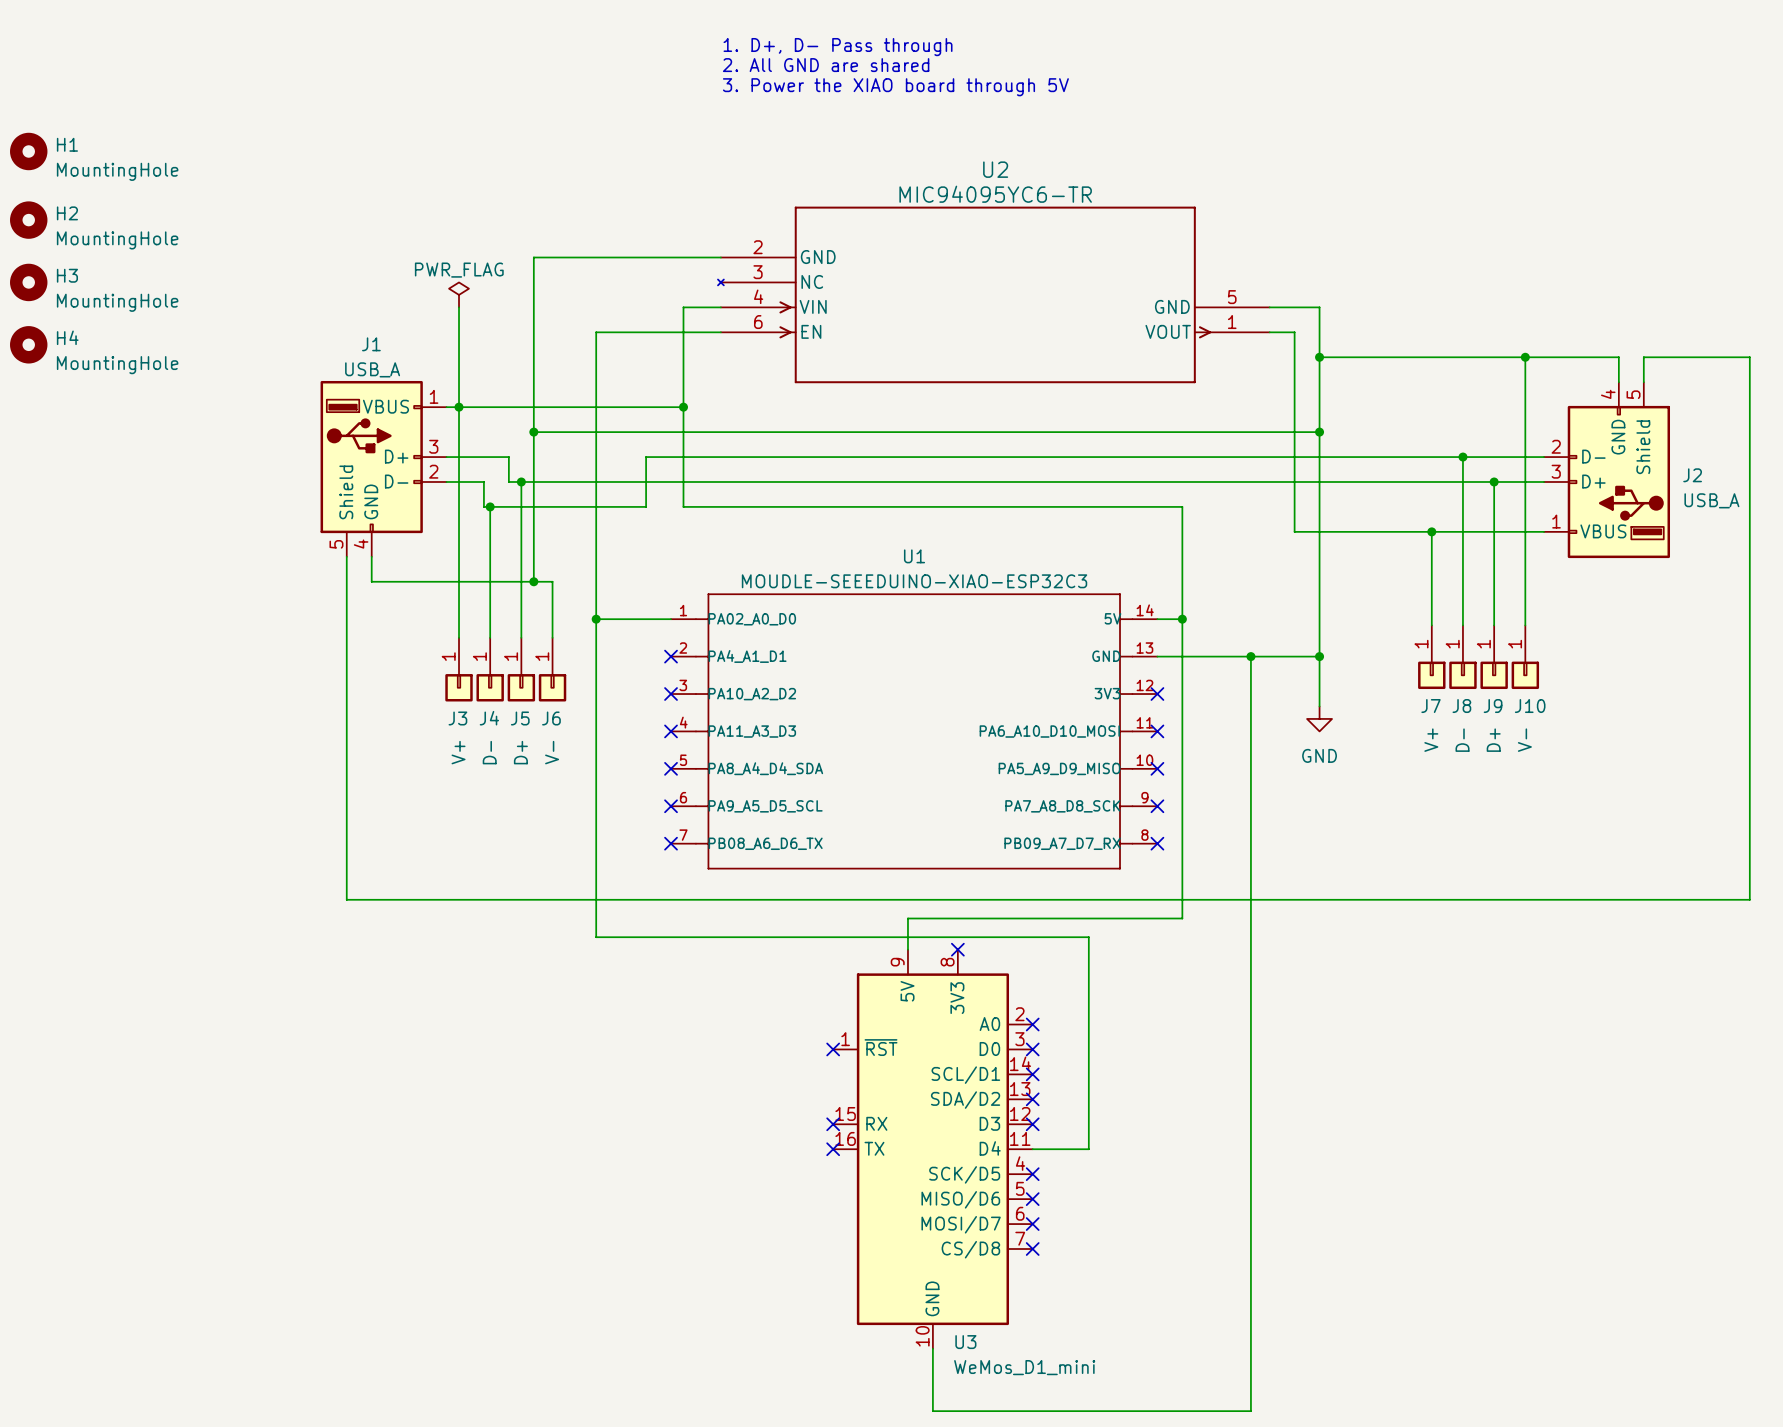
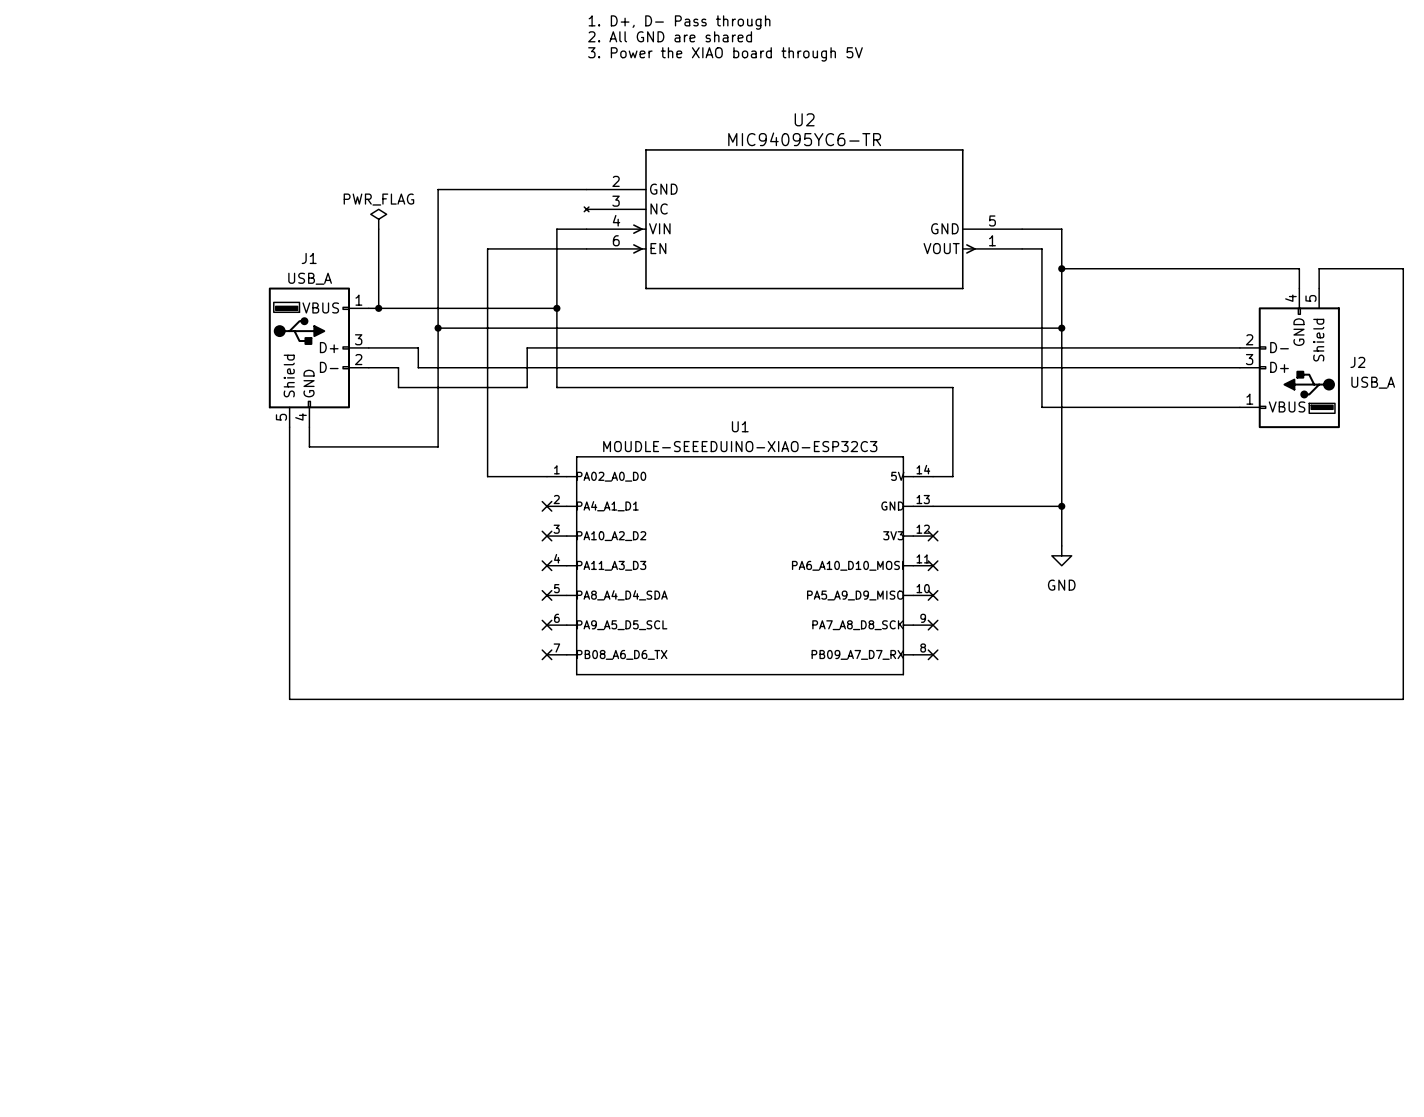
H1: MountingHole (28, 151) -> none
H2: MountingHole (28, 220) -> none
H3: MountingHole (28, 282) -> none
H4: MountingHole (28, 344) -> none
wire: (1525, 357) (1525, 625) -> none
junction: (1525, 357) -> none
wire: (459, 407) (459, 637) -> none
wire: (1462, 457) (1462, 625) -> none
junction: (1462, 457) -> none
wire: (521, 481) (521, 637) -> none
junction: (521, 481) -> none
wire: (1494, 481) (1494, 625) -> none
junction: (1494, 481) -> none
wire: (490, 506) (490, 637) -> none
junction: (490, 506) -> none
wire: (1431, 531) (1431, 625) -> none
junction: (1431, 531) -> none
wire: (533, 581) (552, 581) (552, 637) -> none
junction: (533, 581) -> none
wire: (596, 619) (596, 937) (1088, 937) (1088, 1149) (1032, 1149) -> none
junction: (596, 619) -> none
wire: (1182, 619) (1182, 918) (907, 918) (907, 949) -> none
junction: (1182, 619) -> none
wire: (1250, 656) (1250, 1411) (932, 1411) (932, 1348) -> none
junction: (1250, 656) -> none
J7: V+ (1431, 657) -> none
J8: D- (1462, 657) -> none
J9: D+ (1494, 657) -> none
J10: V- (1525, 657) -> none
J3: V+ (459, 669) -> none
J4: D- (490, 669) -> none
J5: D+ (521, 669) -> none
J6: V- (552, 669) -> none
no-connect mark: (957, 949) -> none
no-connect mark: (1032, 1024) -> none
no-connect mark: (833, 1049) -> none
no-connect mark: (1032, 1049) -> none
no-connect mark: (1032, 1074) -> none
no-connect mark: (1032, 1099) -> none
no-connect mark: (833, 1124) -> none
no-connect mark: (1032, 1124) -> none
no-connect mark: (833, 1149) -> none
U3: WeMos_D1_mini (932, 1149) -> none
no-connect mark: (1032, 1174) -> none
no-connect mark: (1032, 1199) -> none
no-connect mark: (1032, 1224) -> none
no-connect mark: (1032, 1249) -> none

